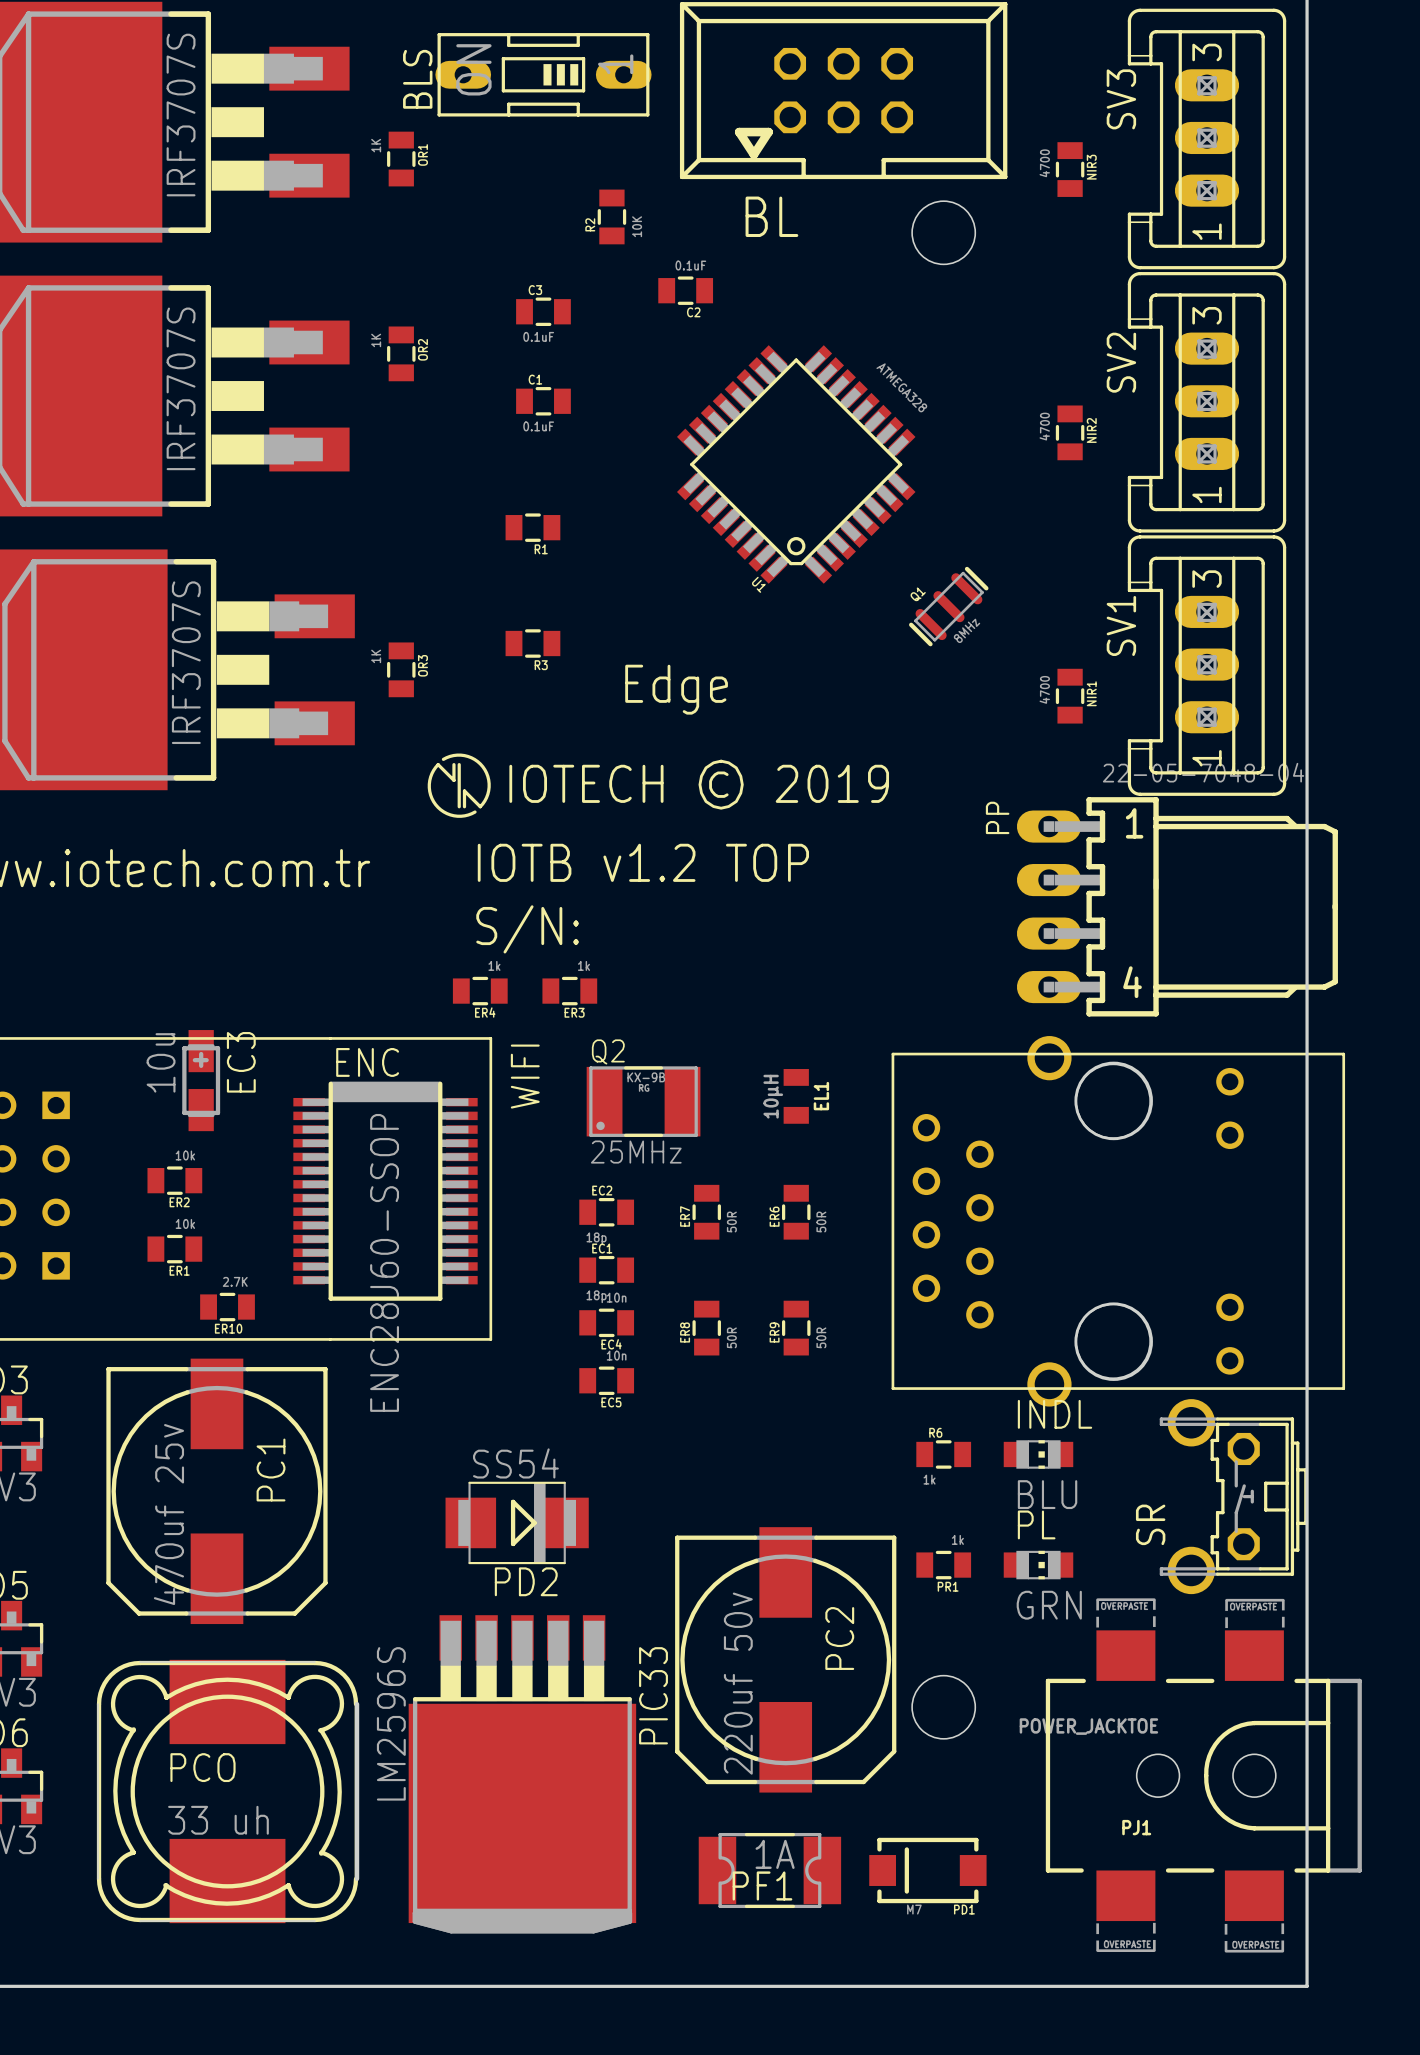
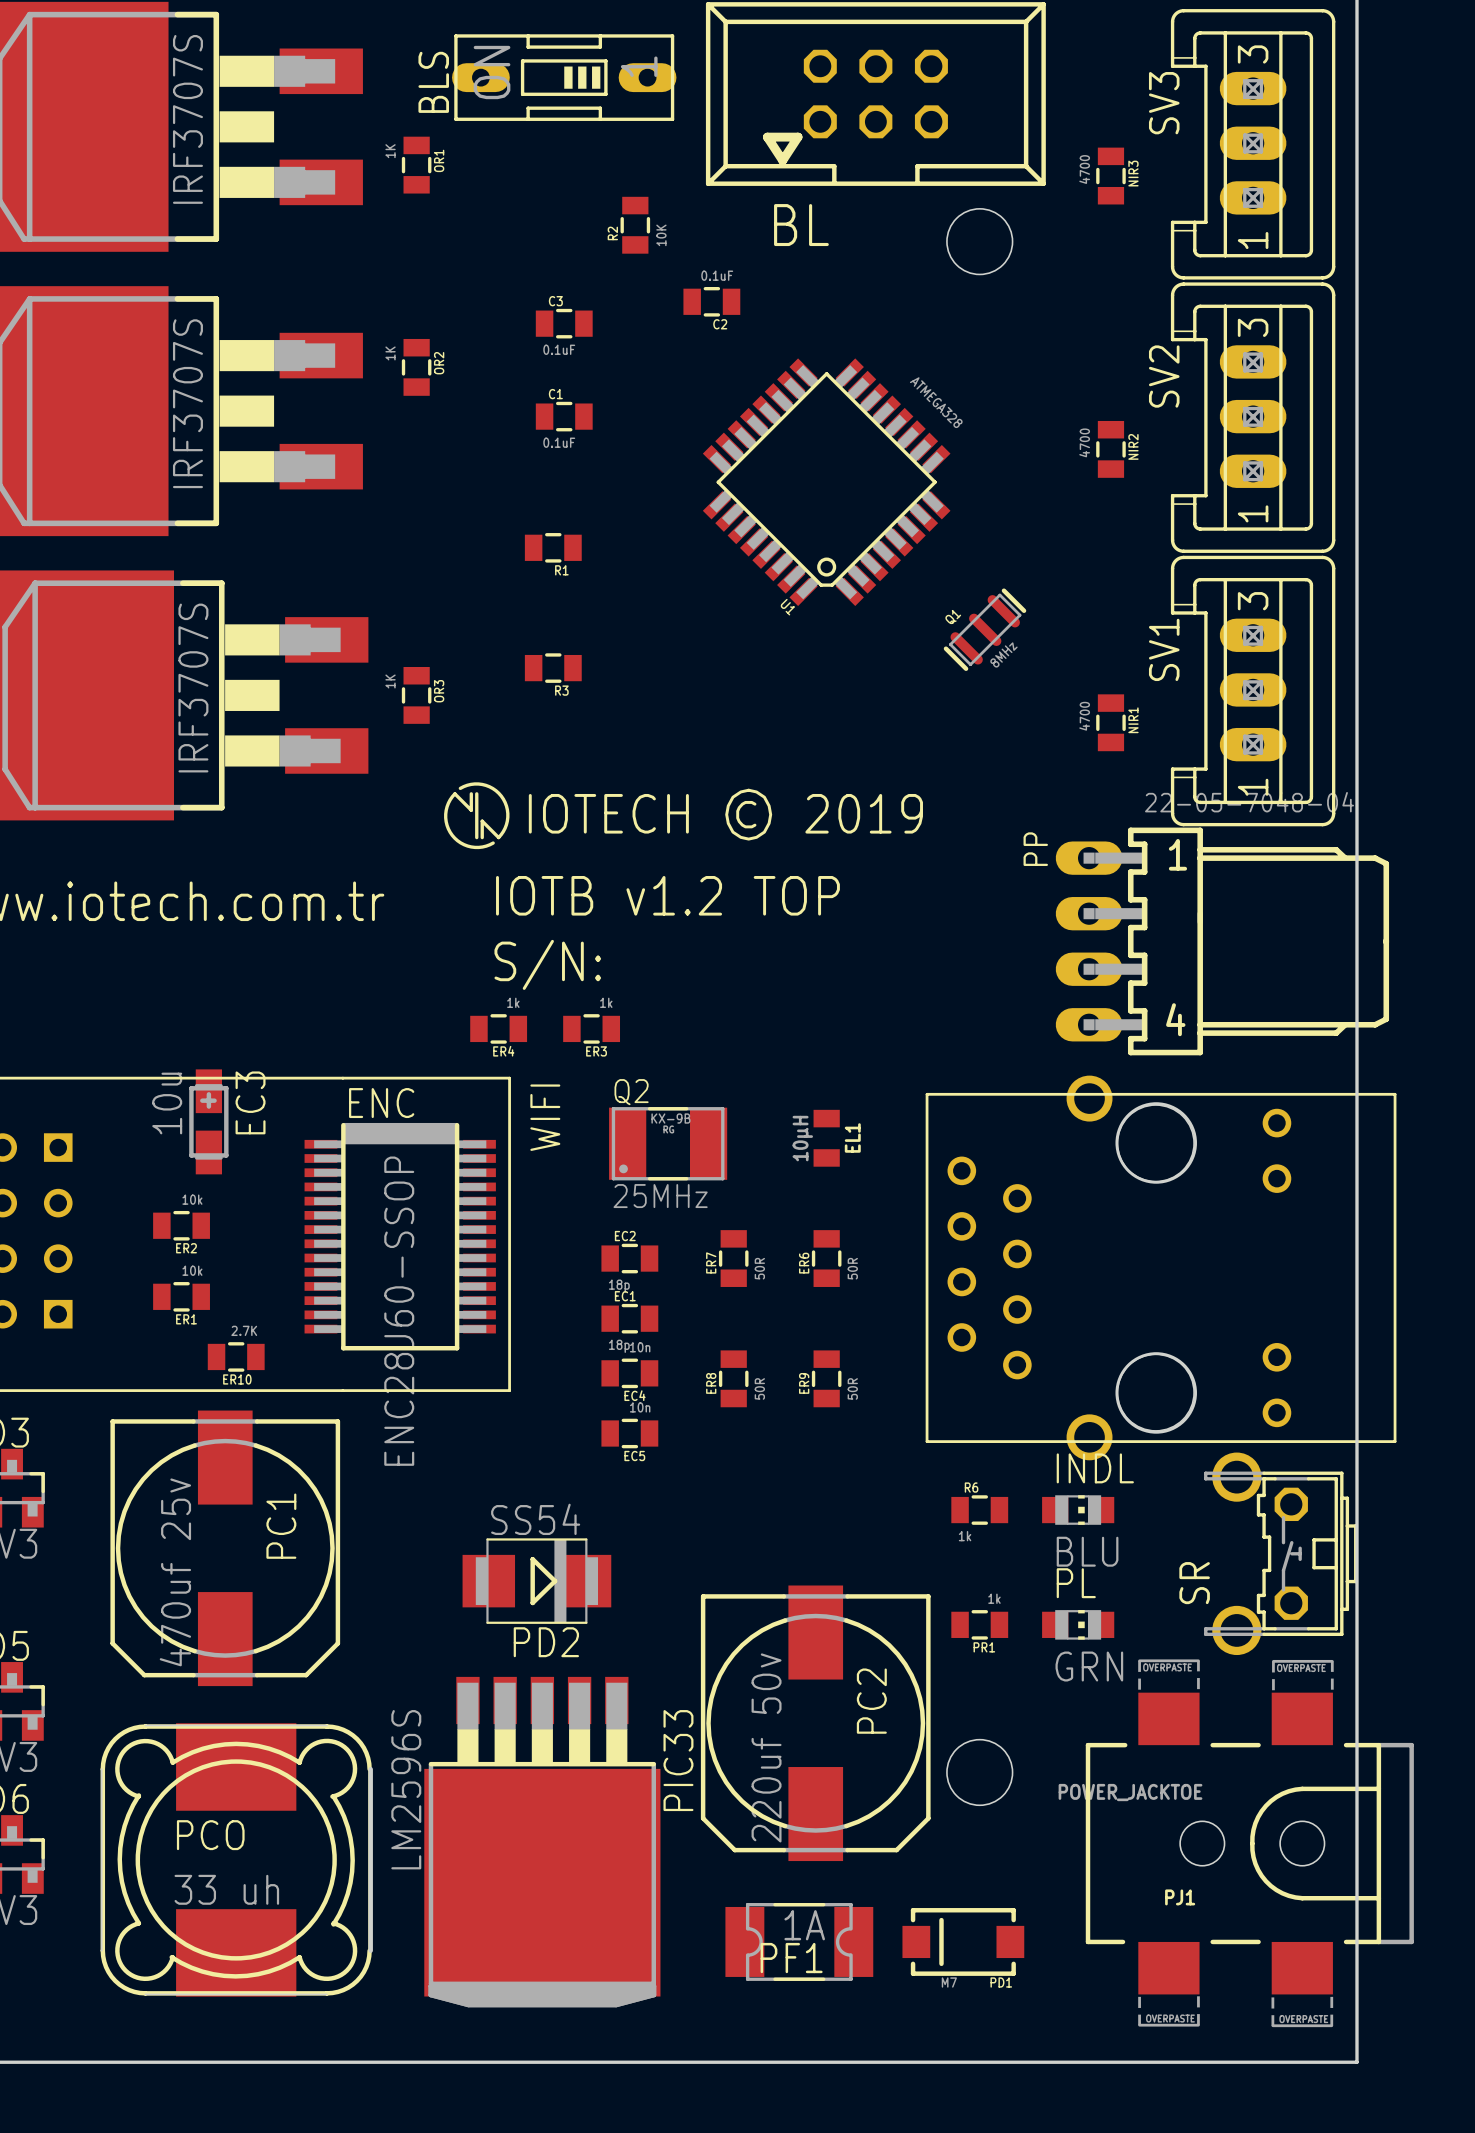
text: Edge (676, 689) -> none

